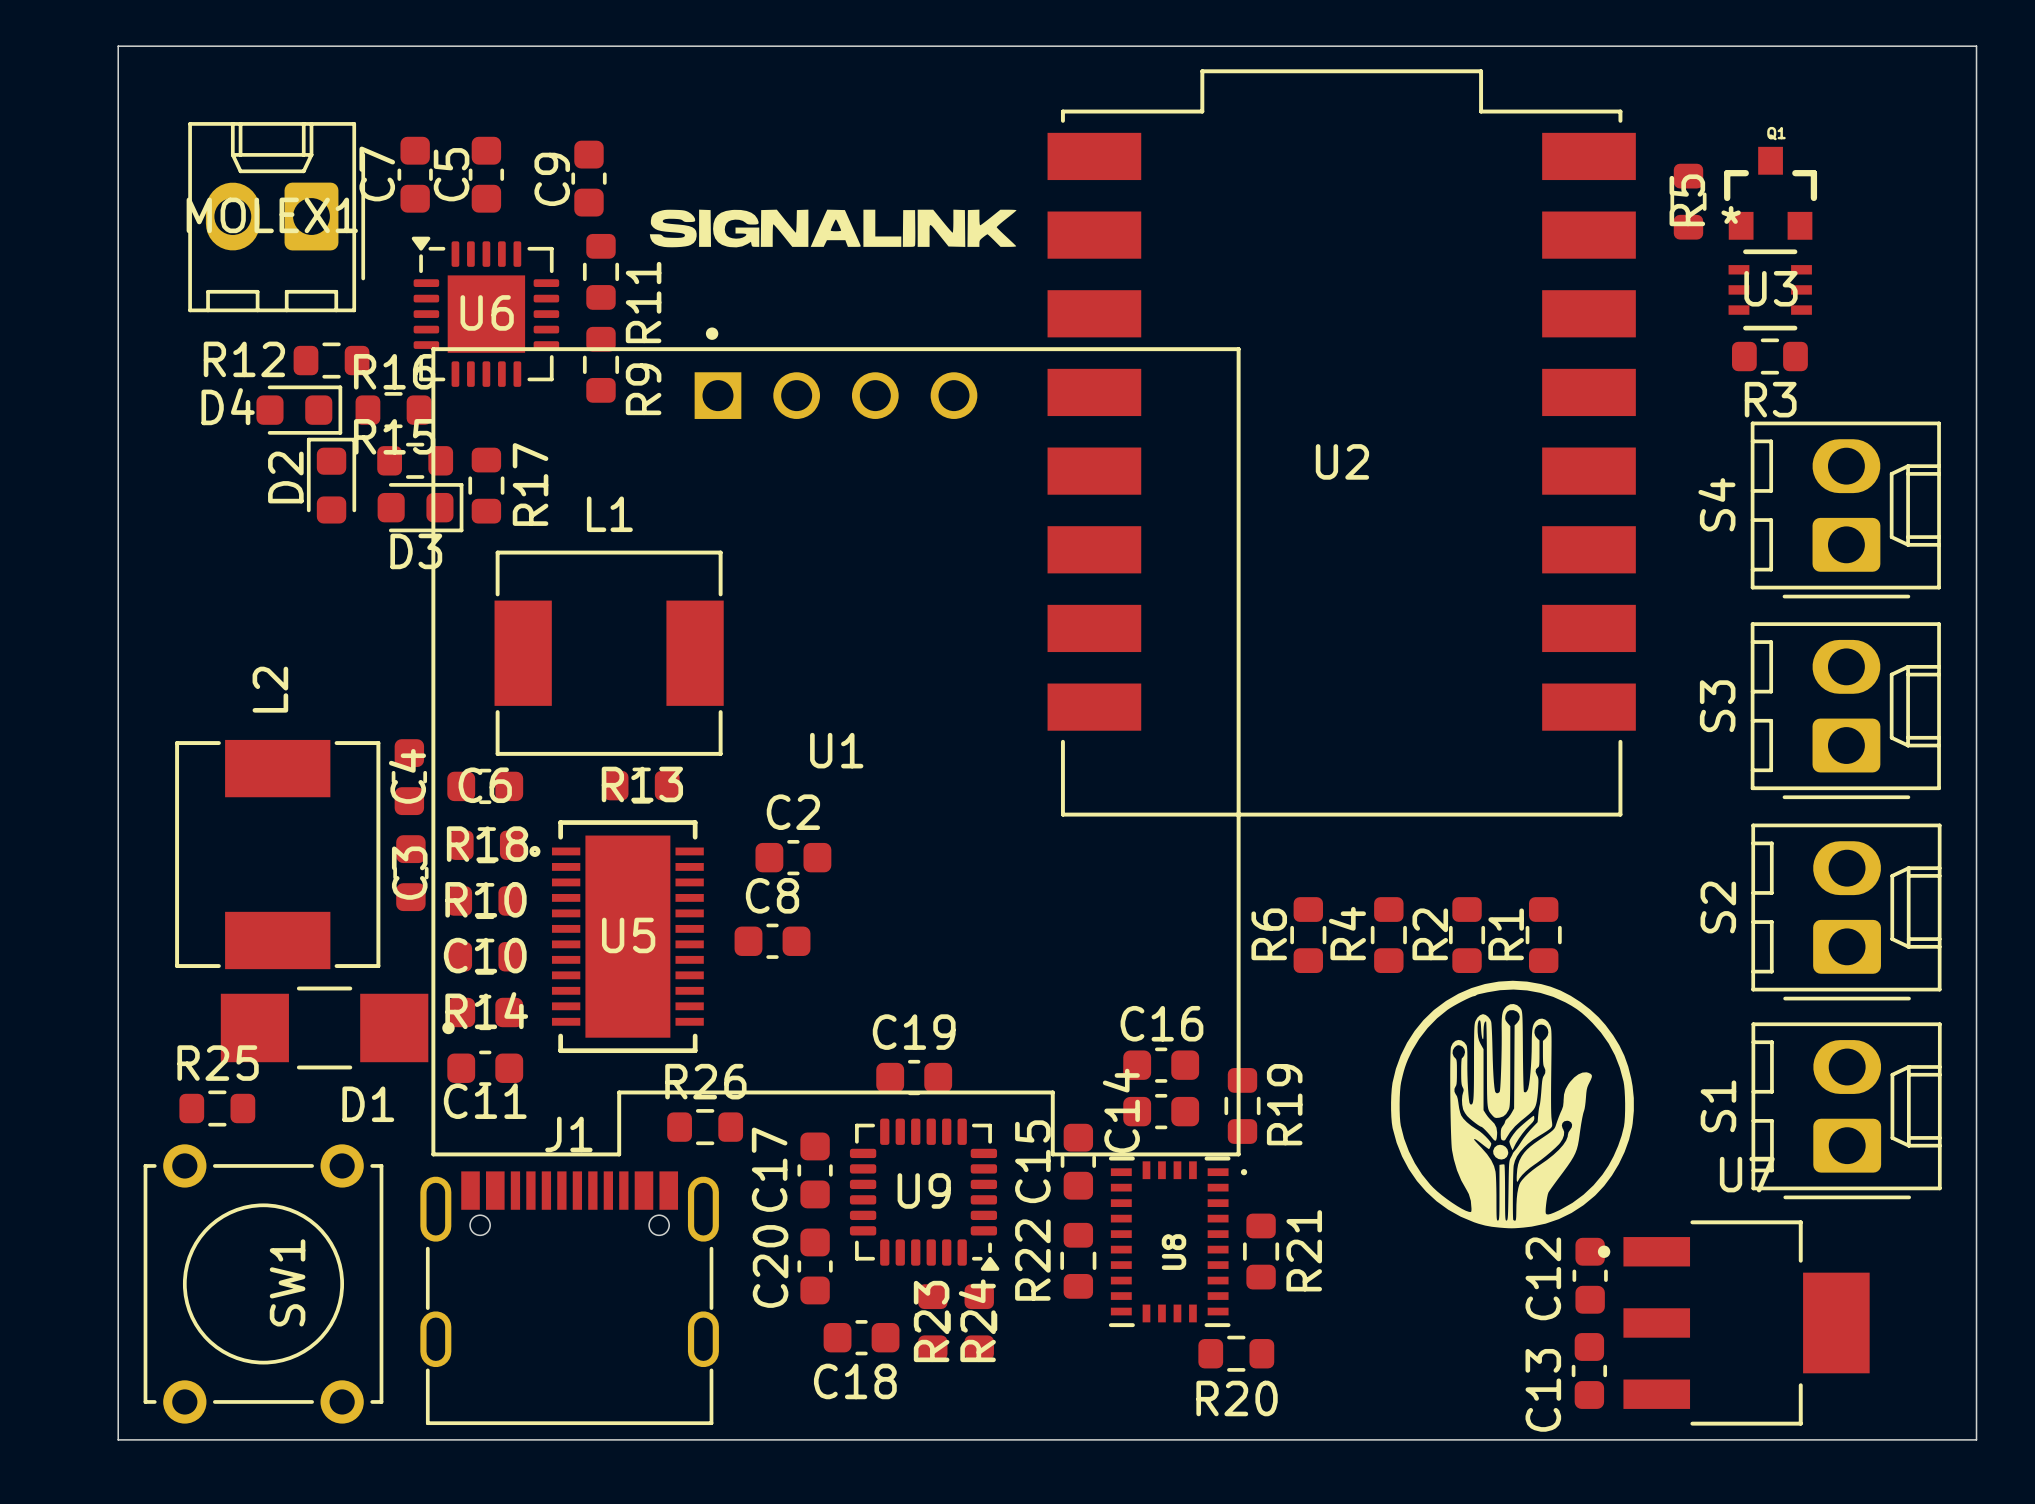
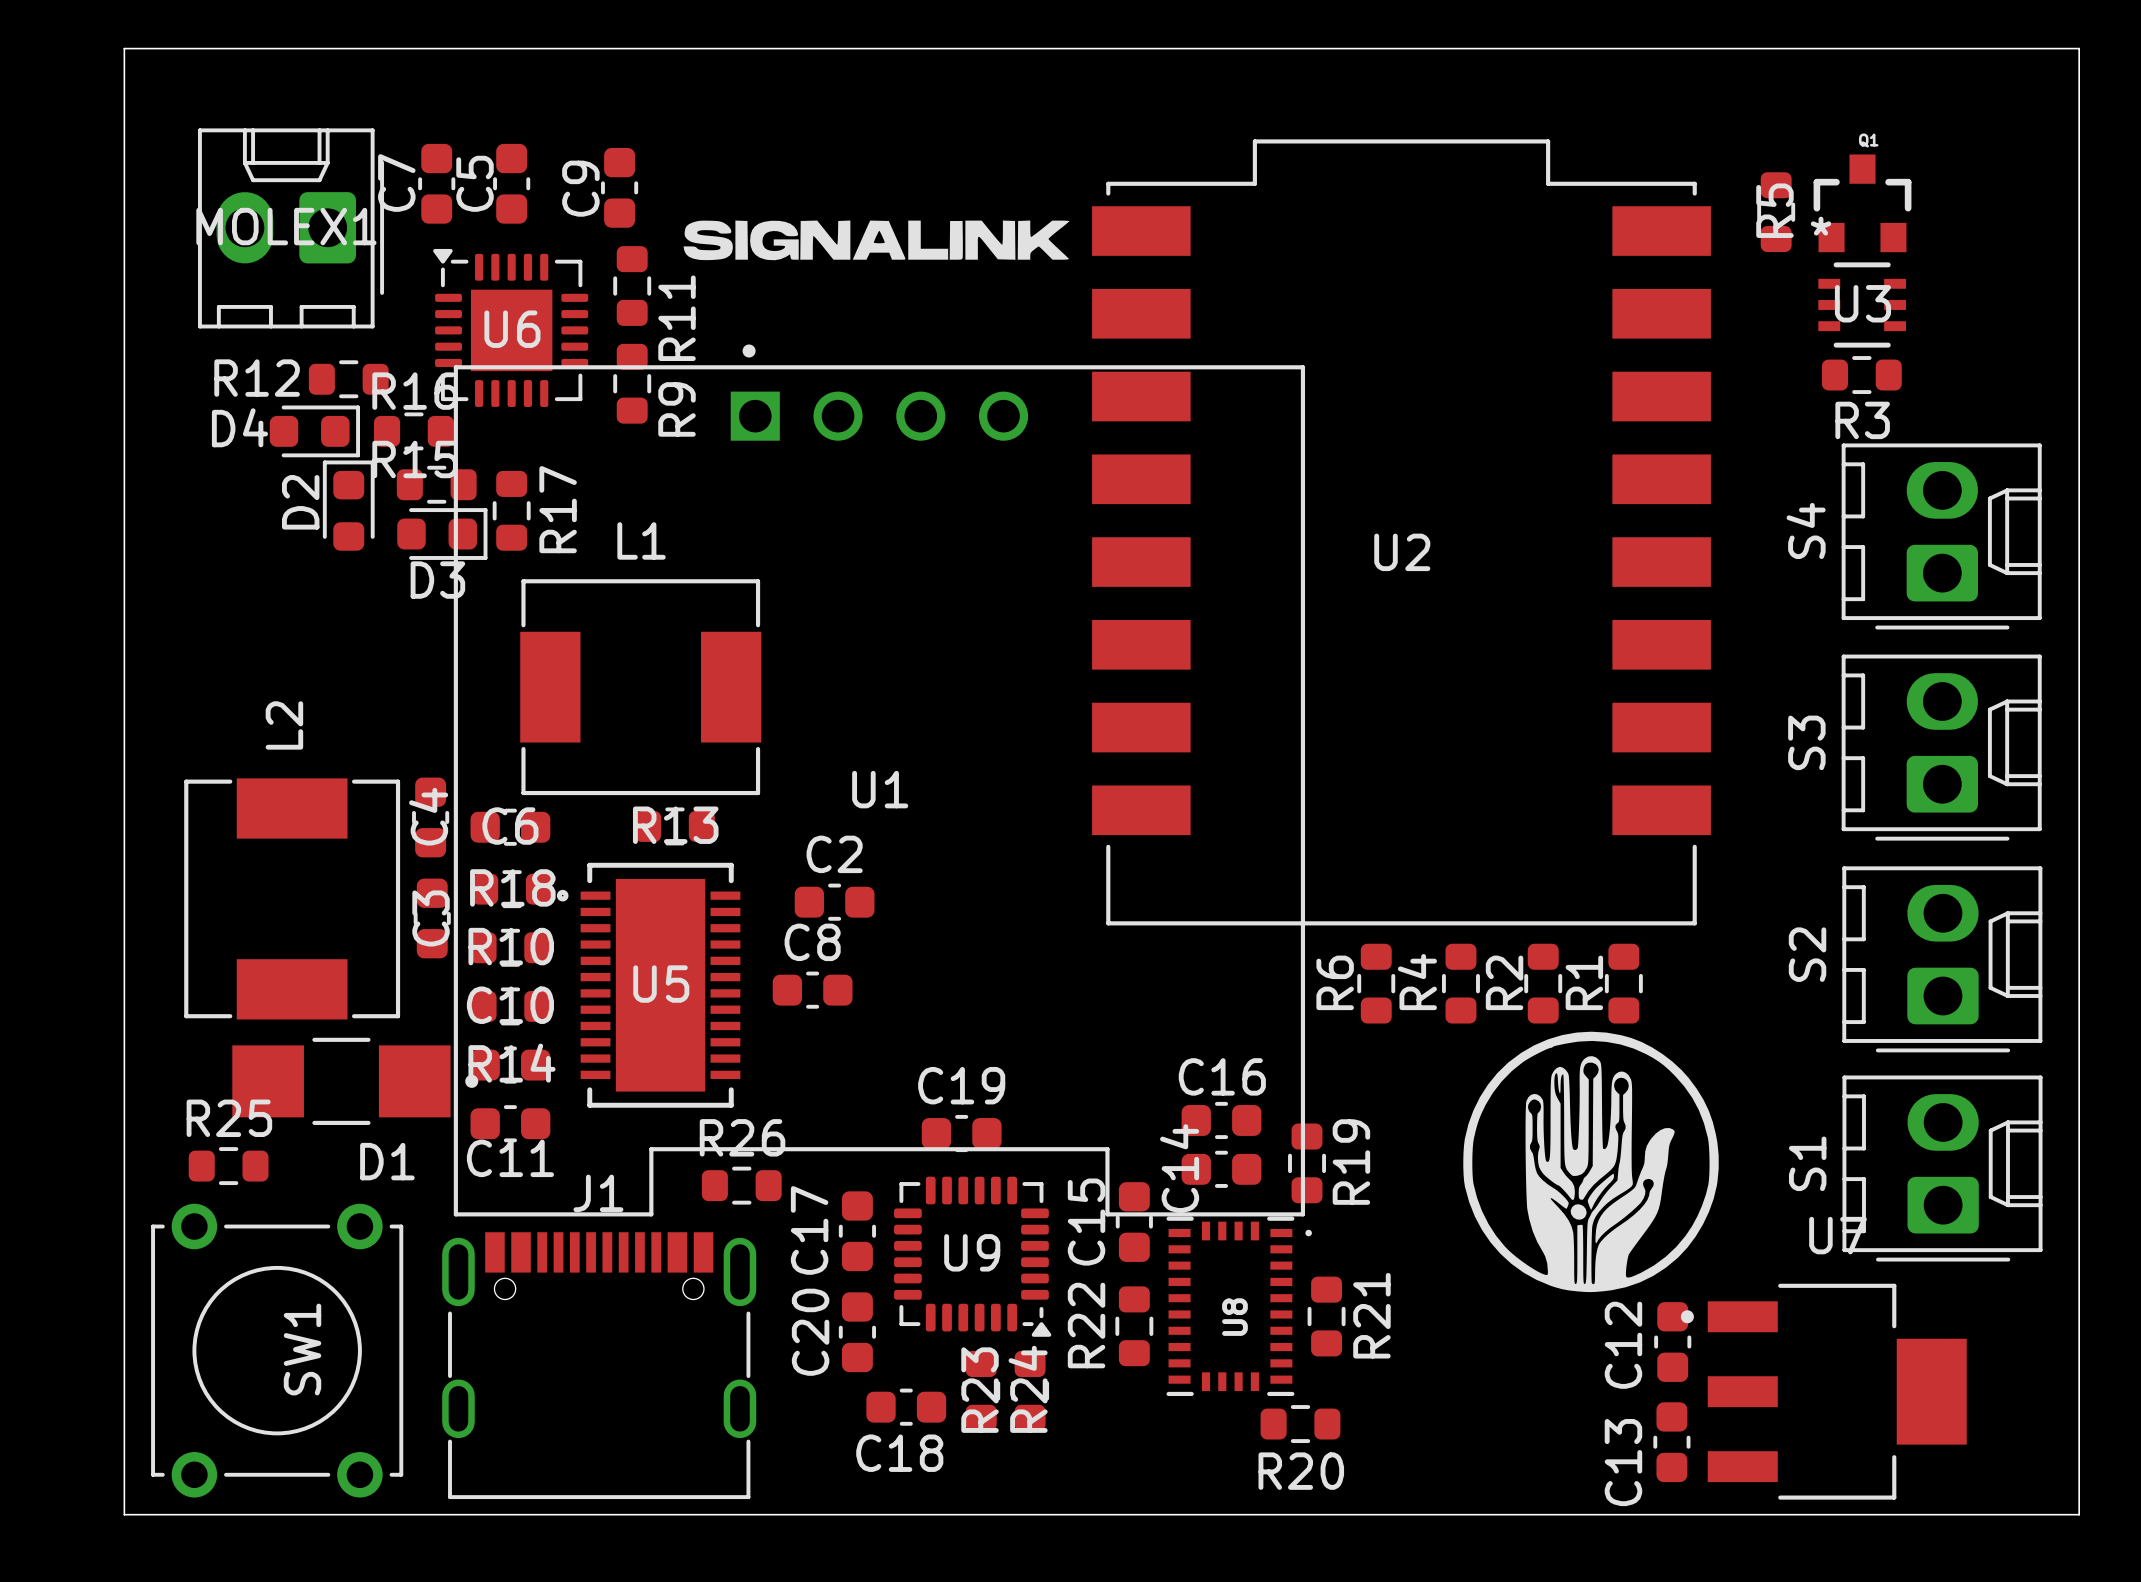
U2 position: (1341, 442) -> (1401, 532)

